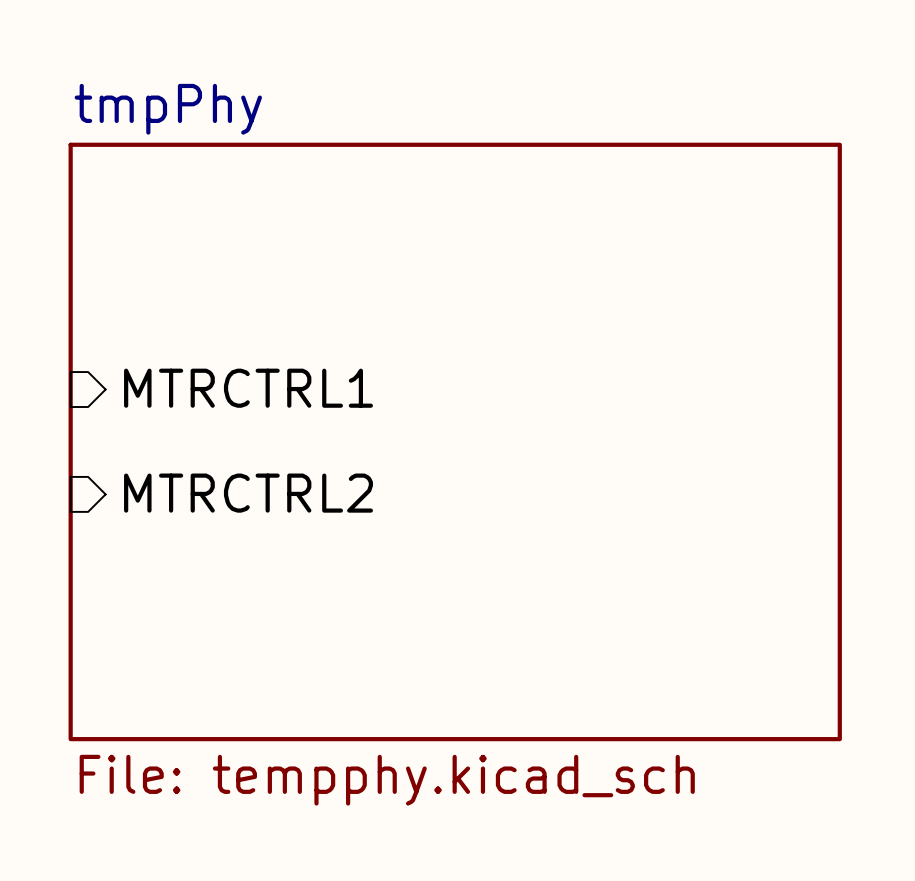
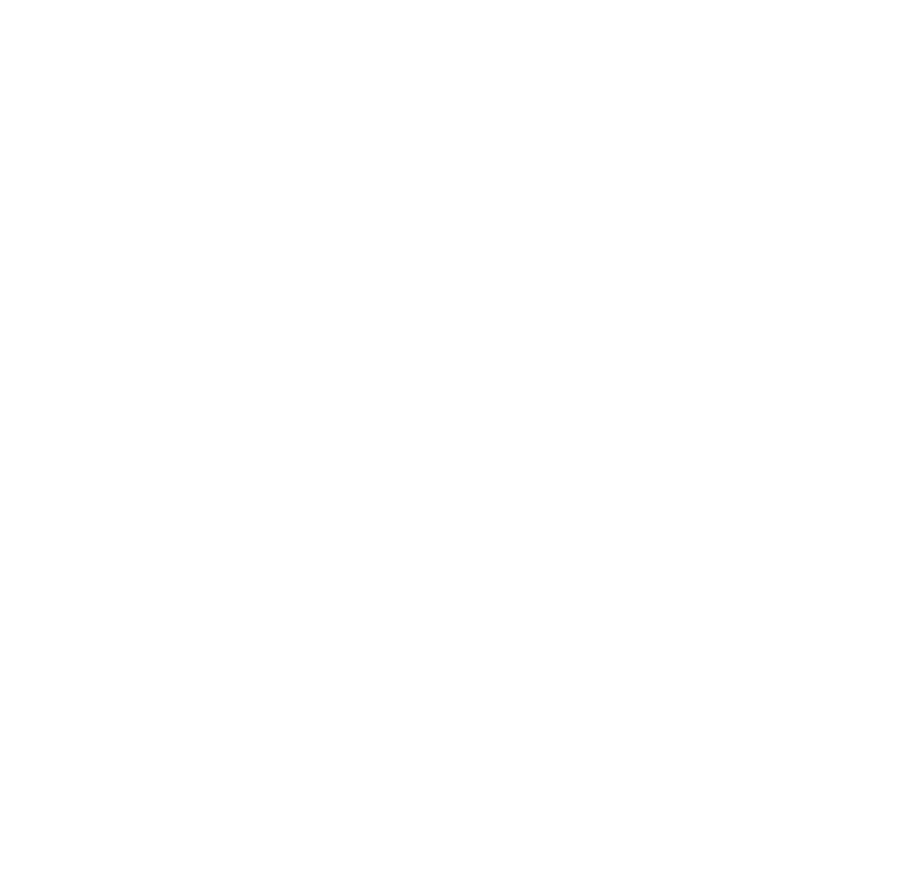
sheet pin: MTRCTRL1 (248, 388) -> none
sheet tmpPhy: File: tempphy.kicad_sch (455, 441) -> none
sheet pin: MTRCTRL2 (248, 493) -> none

